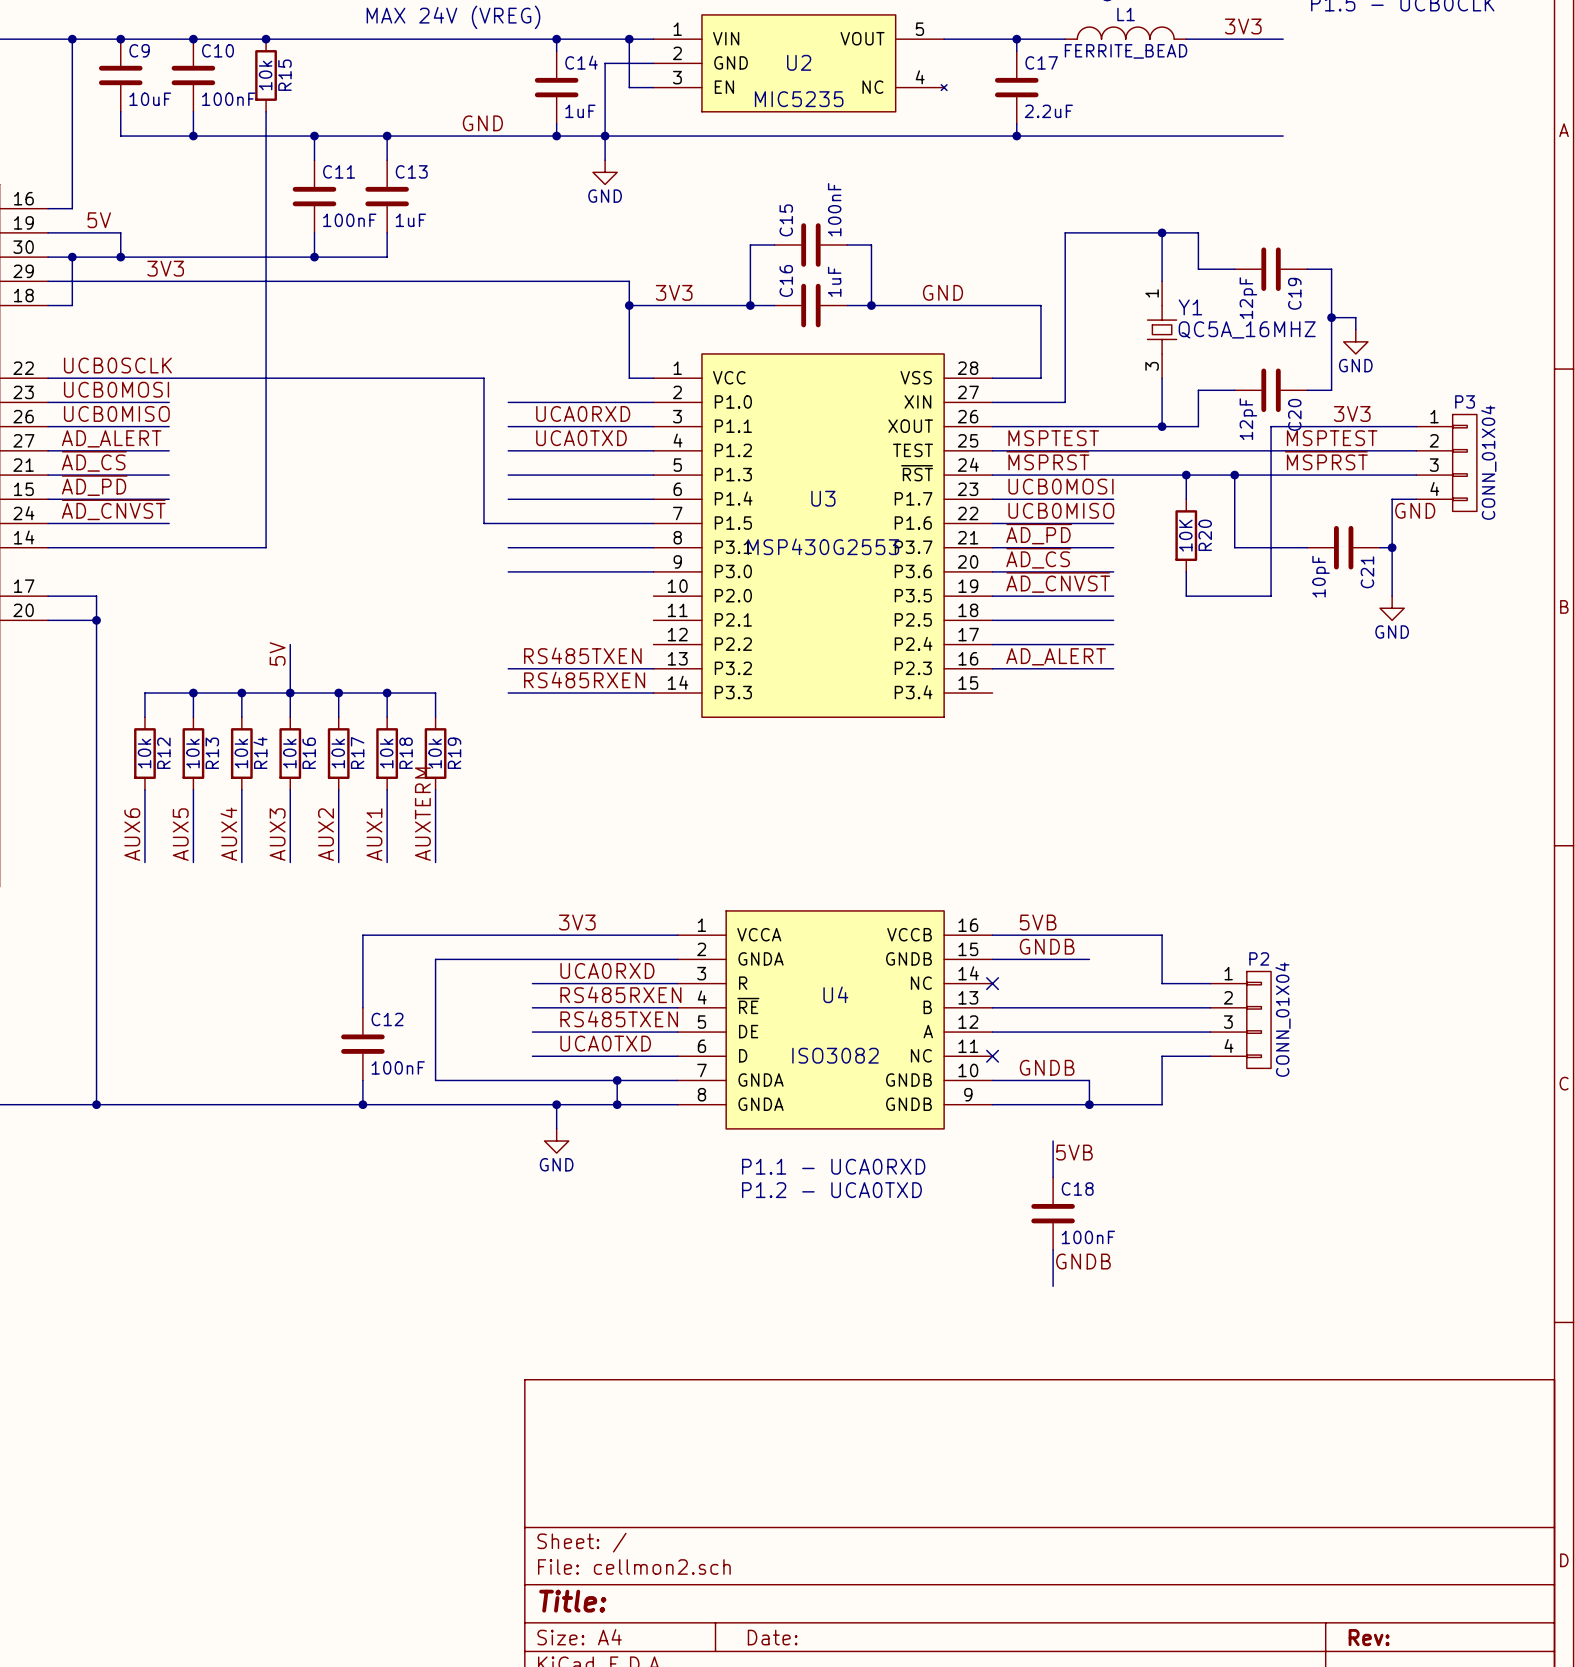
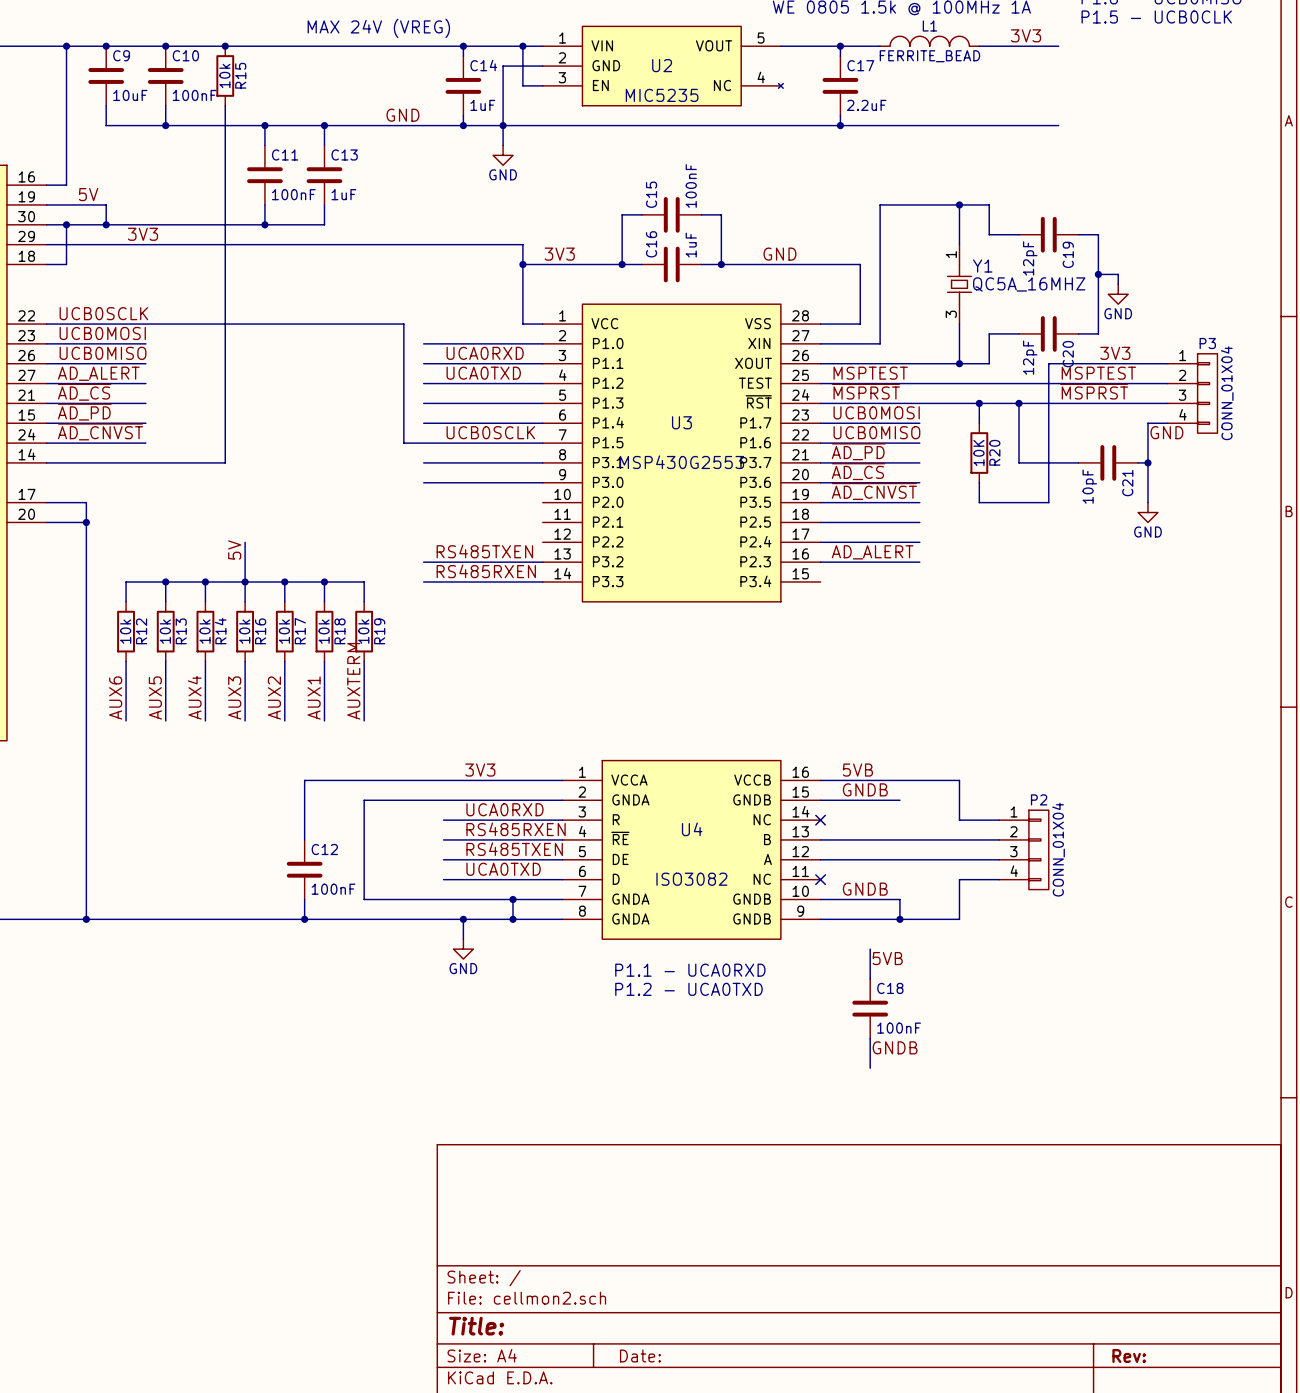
label: none -> UCB0SCLK (490, 432)

